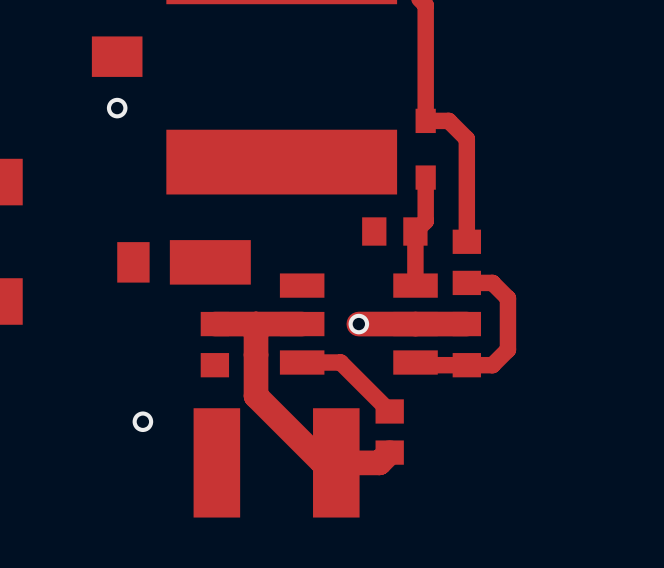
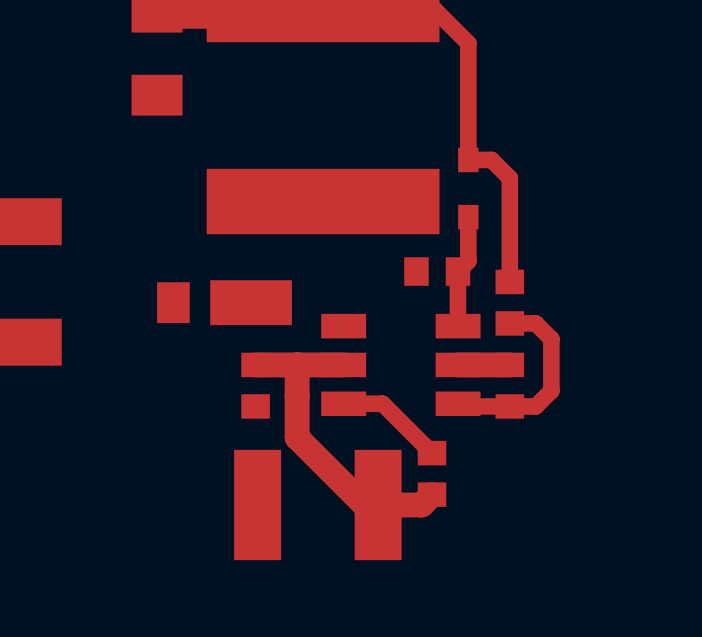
via: (117, 108) -> none
via: (358, 324) -> none
top track: (415, 324) (358, 324) -> none
via: (142, 421) -> none

